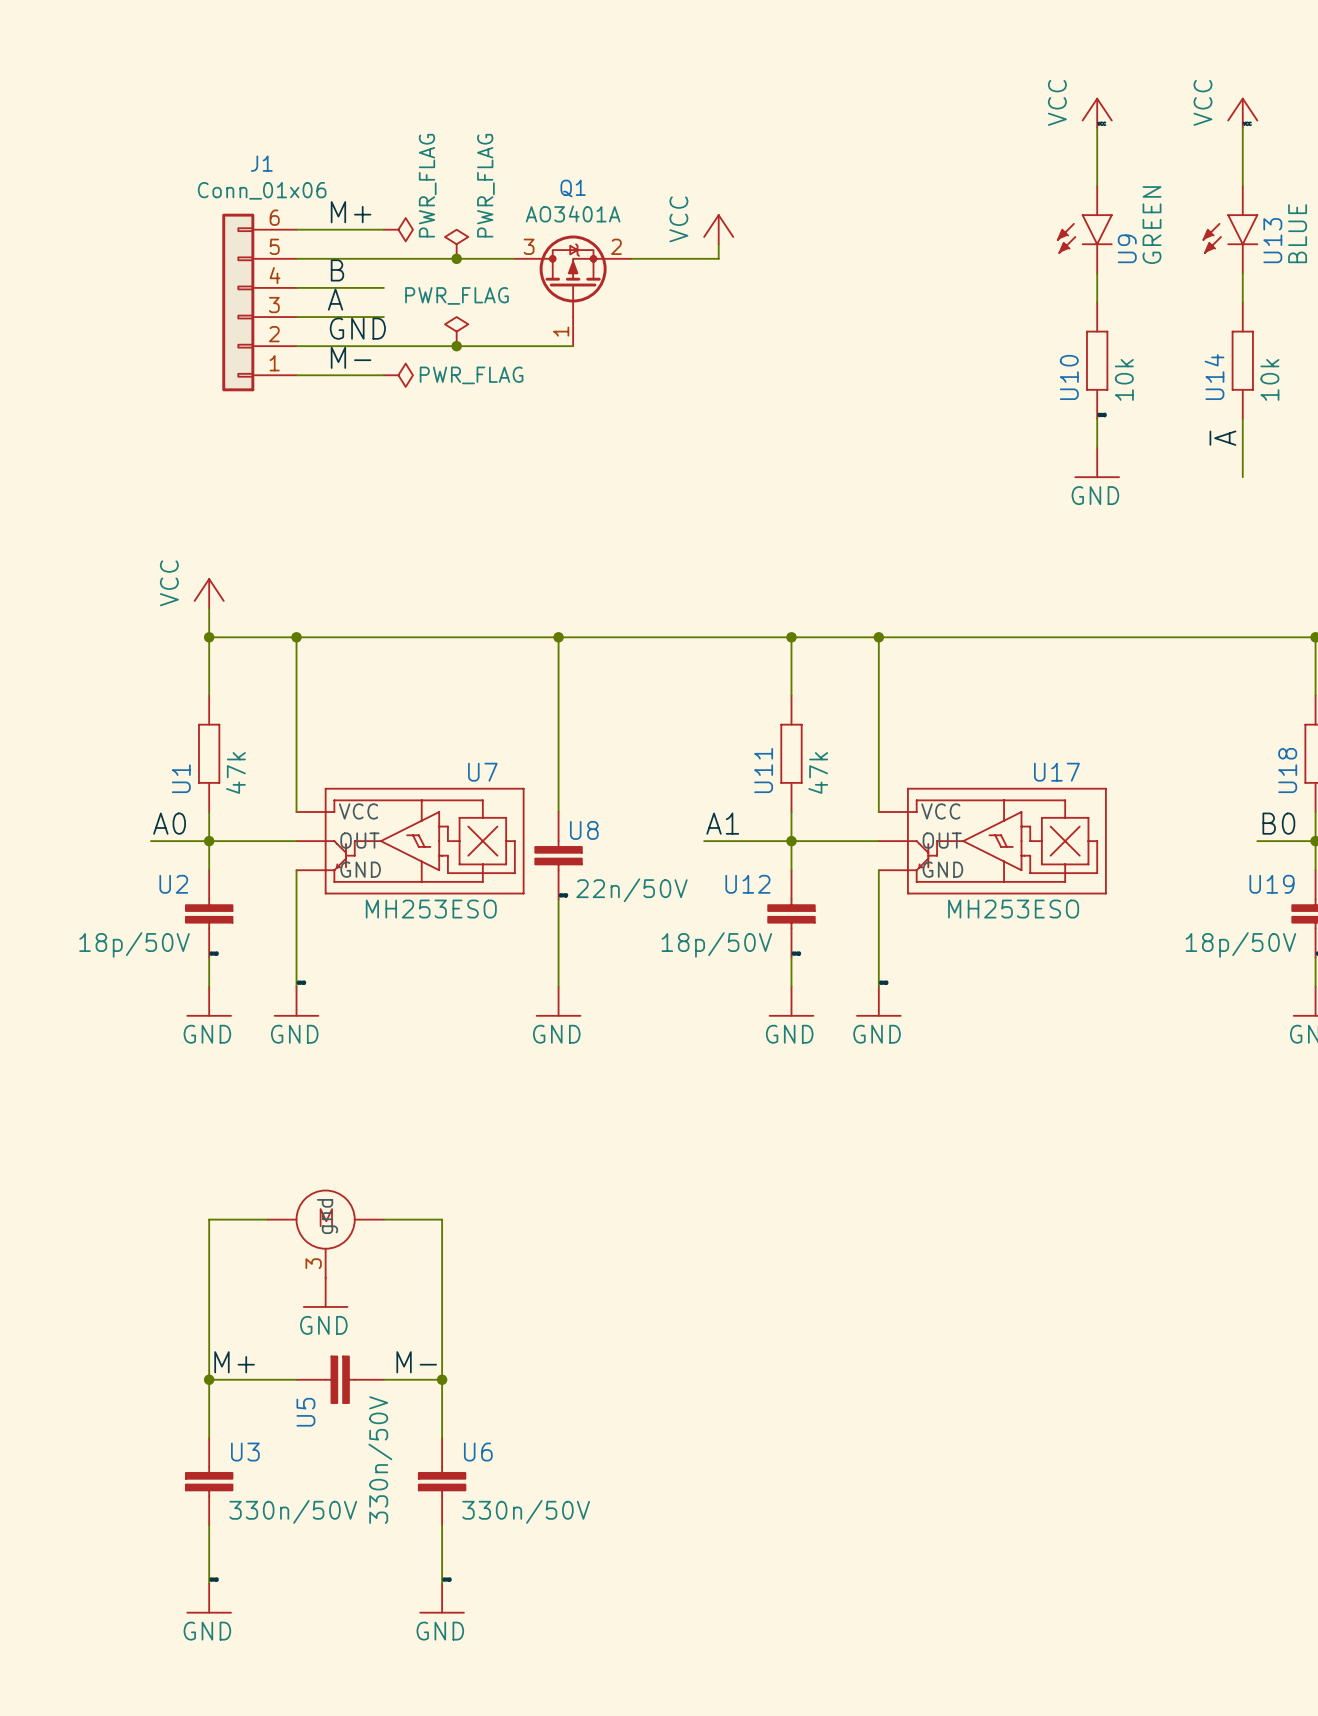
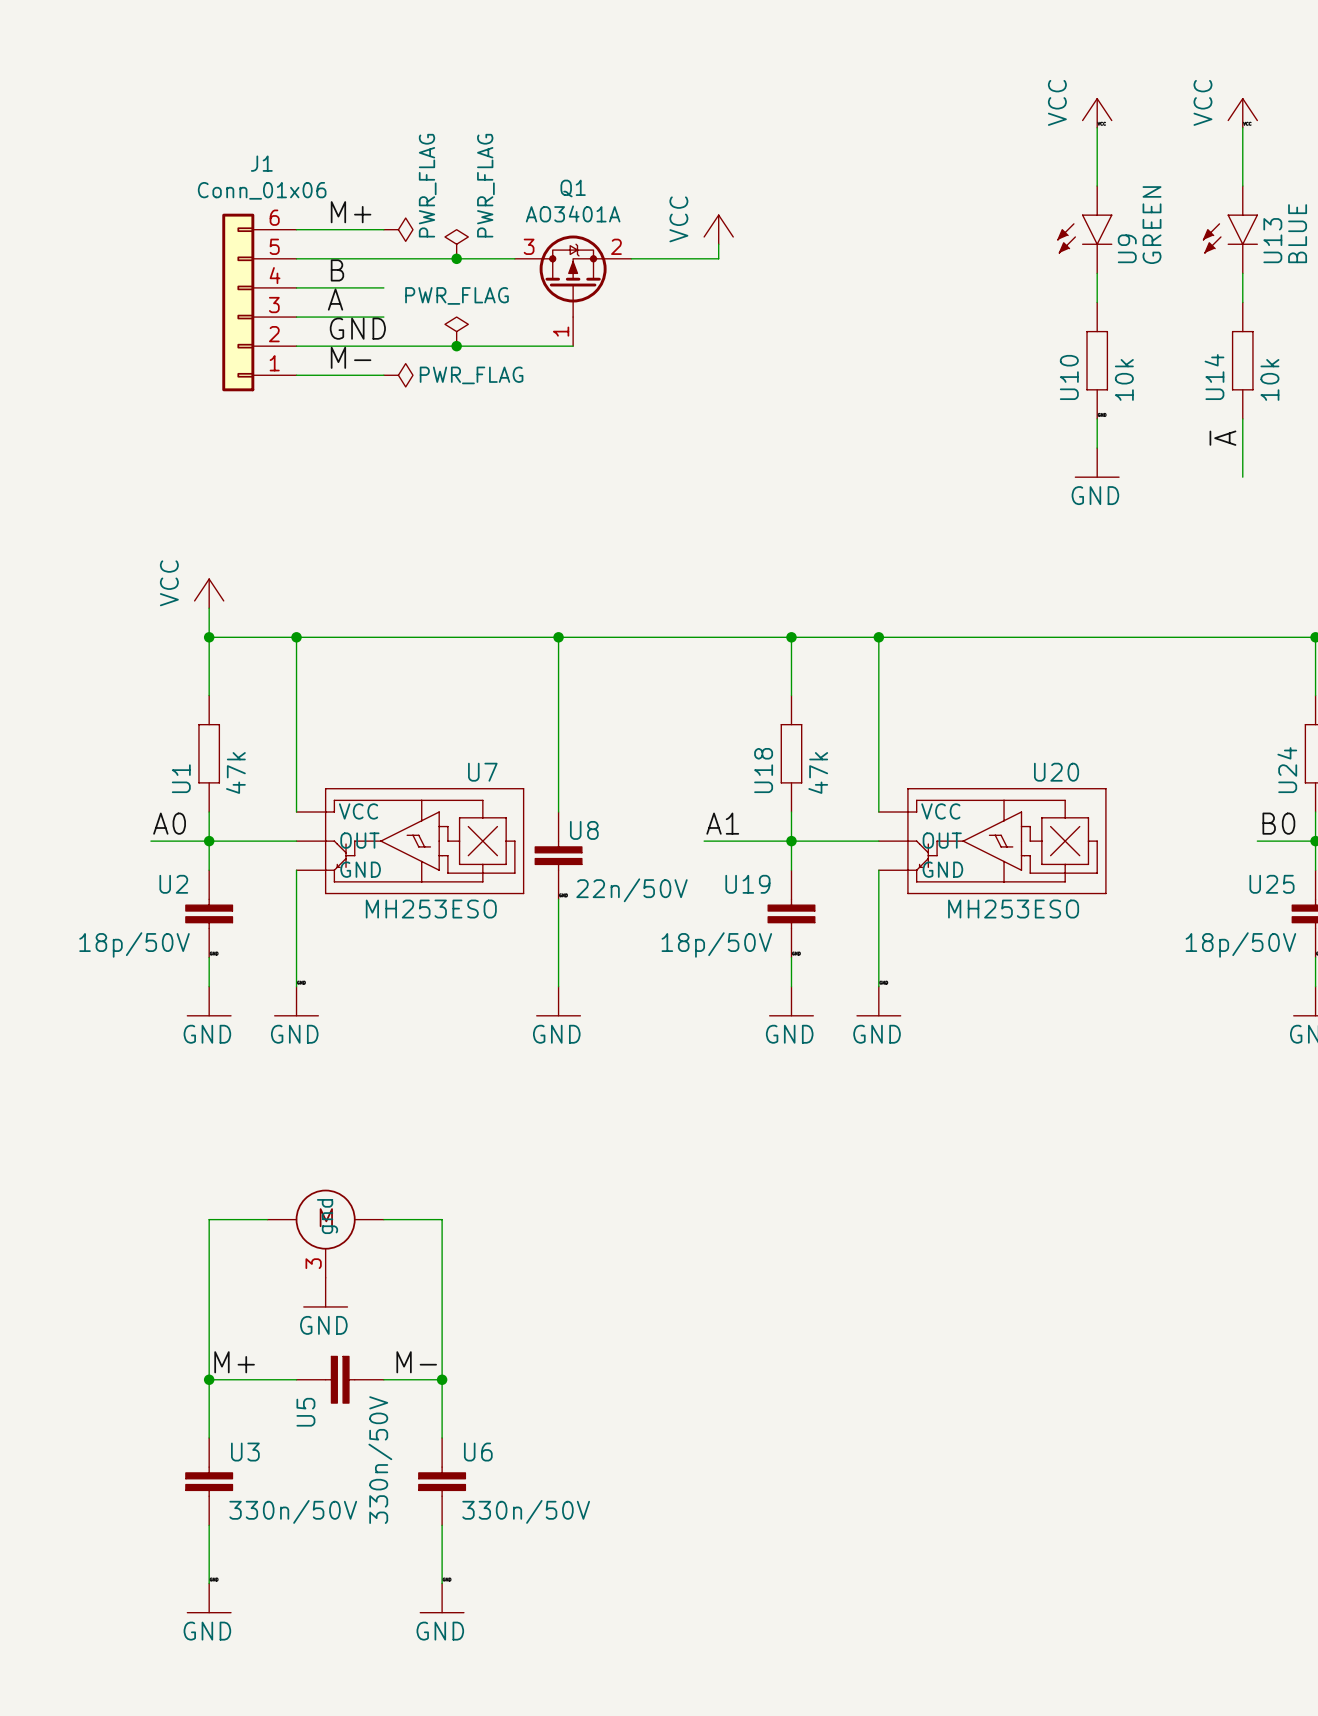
U11 name: U11 (763, 770) -> U18 (763, 770)
U18 name: U18 (1287, 770) -> U24 (1287, 770)
U17 name: U17 (1056, 772) -> U20 (1056, 772)
U12 name: U12 (747, 884) -> U19 (747, 884)
U19 name: U19 (1271, 884) -> U25 (1271, 884)

